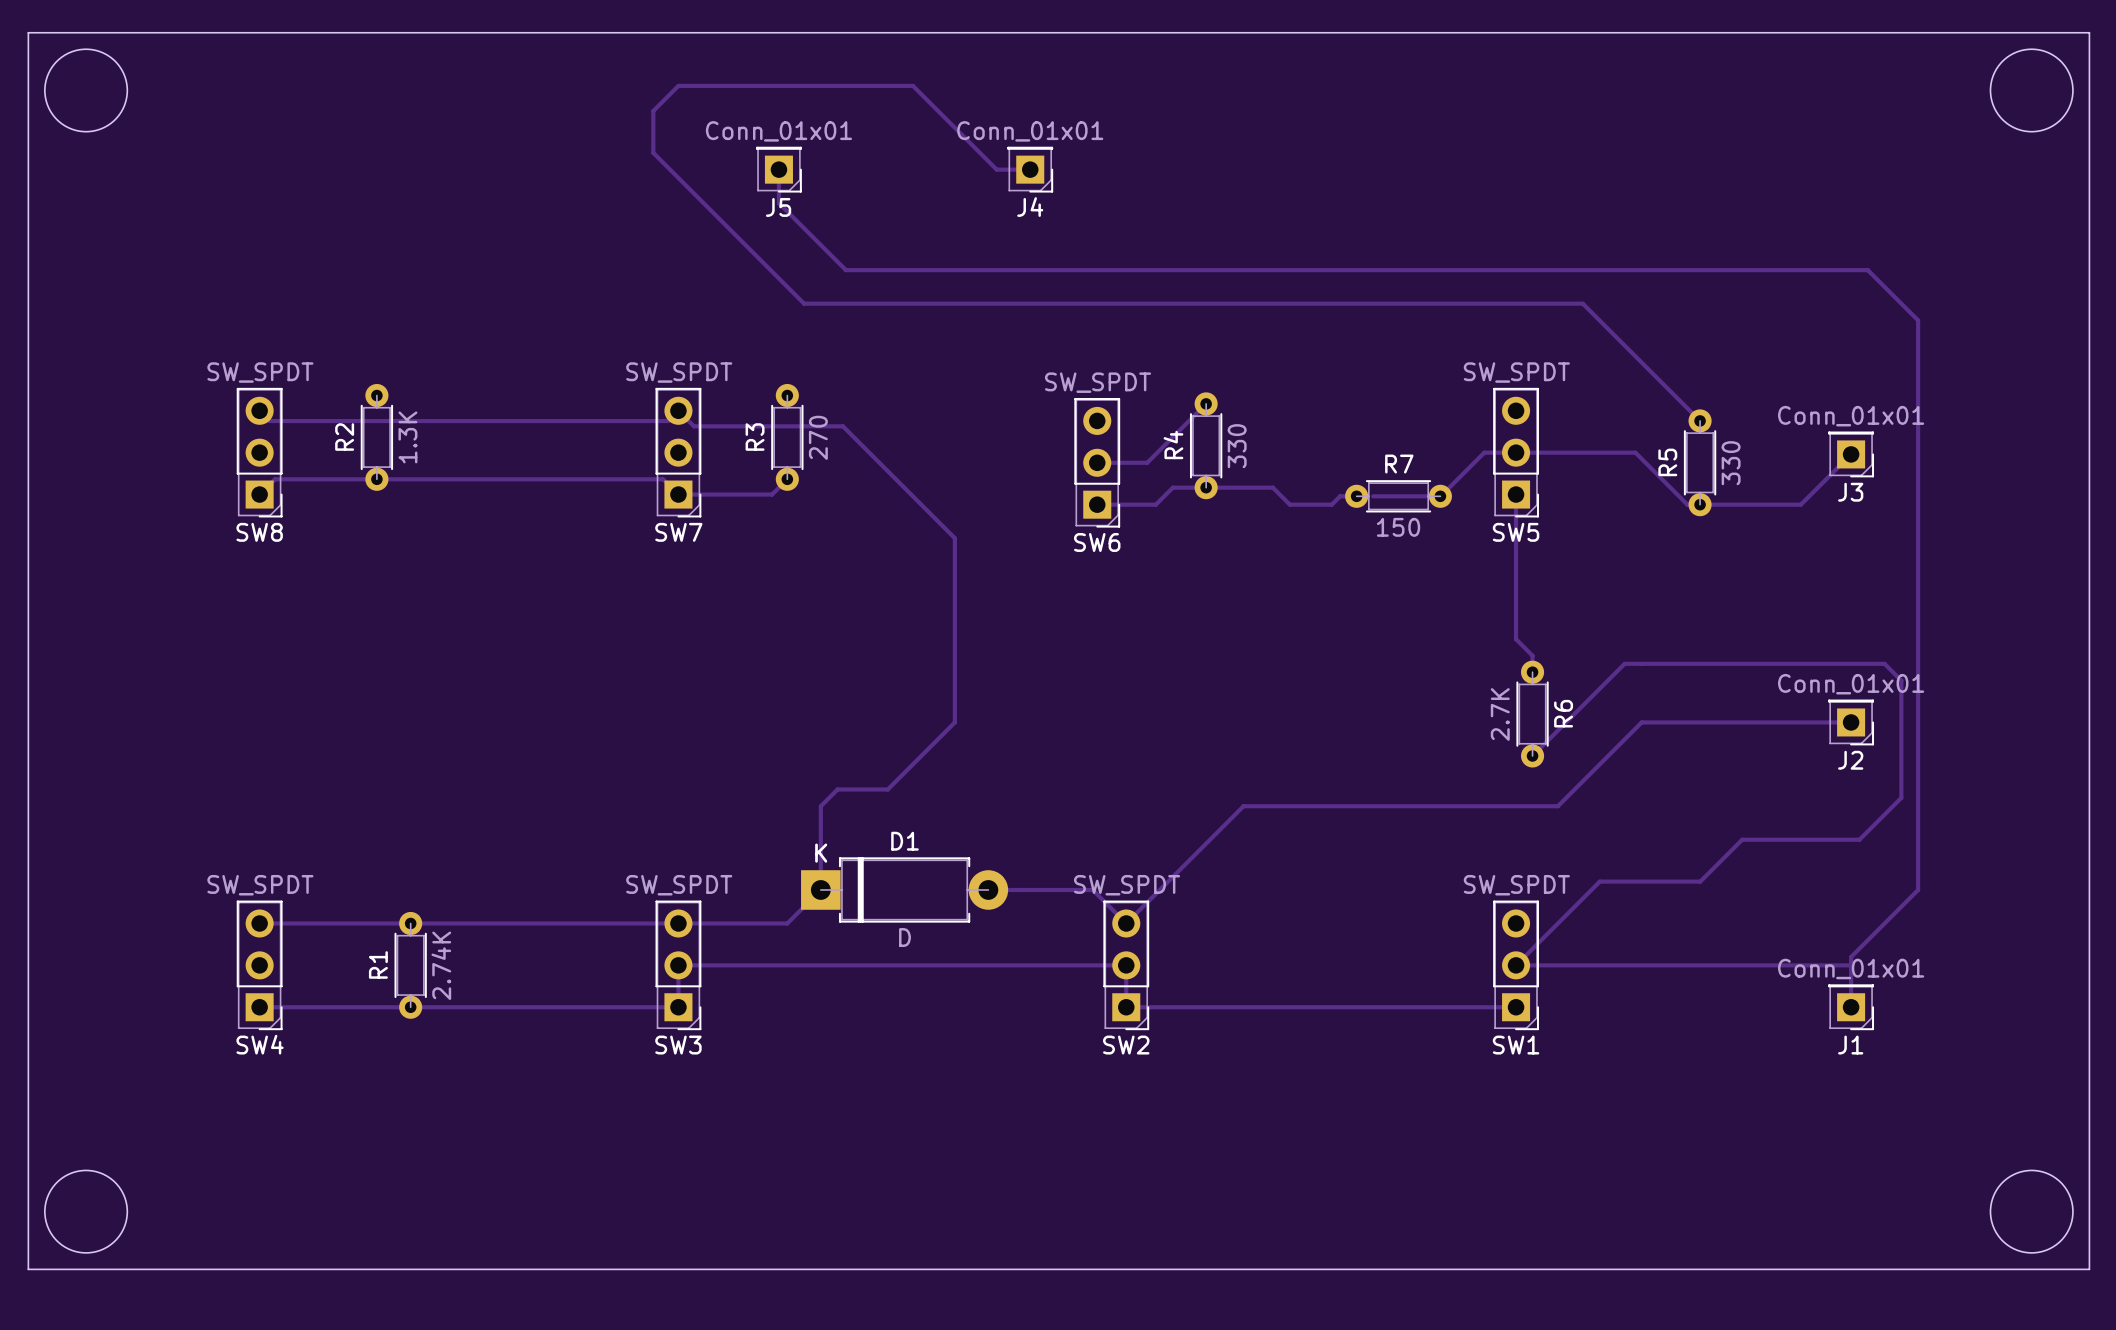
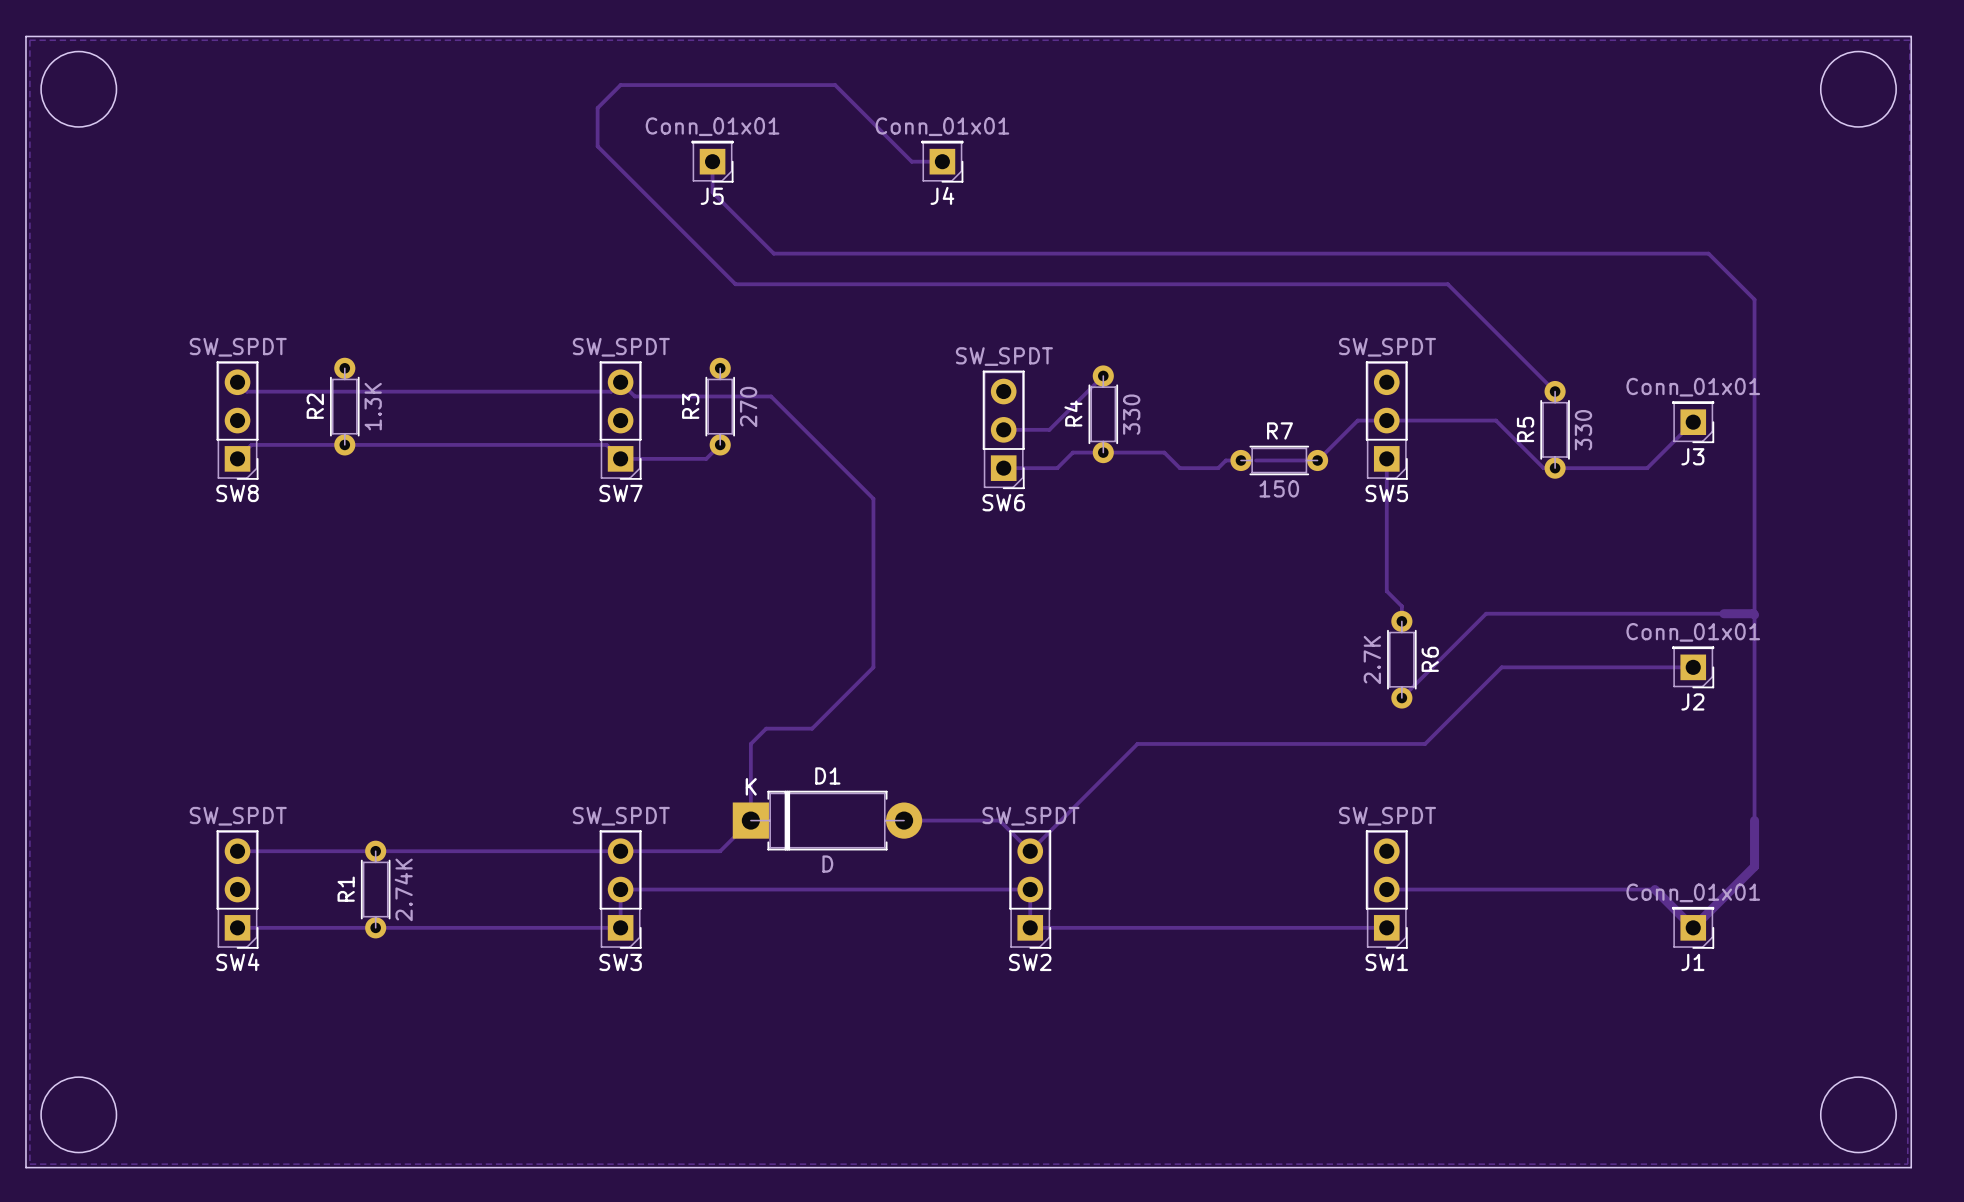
zone outline: none -> (29, 40) (1909, 40) (1907, 1164) (29, 1164) (29, 40)
track: (1884, 663) (1901, 680) (1901, 797) (1859, 839) (1742, 839) (1700, 881) (1599, 881) (1516, 965) -> (1723, 613) (1754, 614)
track: (1918, 889) (1851, 956) (1851, 1007) -> (1754, 820) (1754, 866) (1693, 927) (1654, 889)
track: (1809, 965) (1851, 965) -> none

